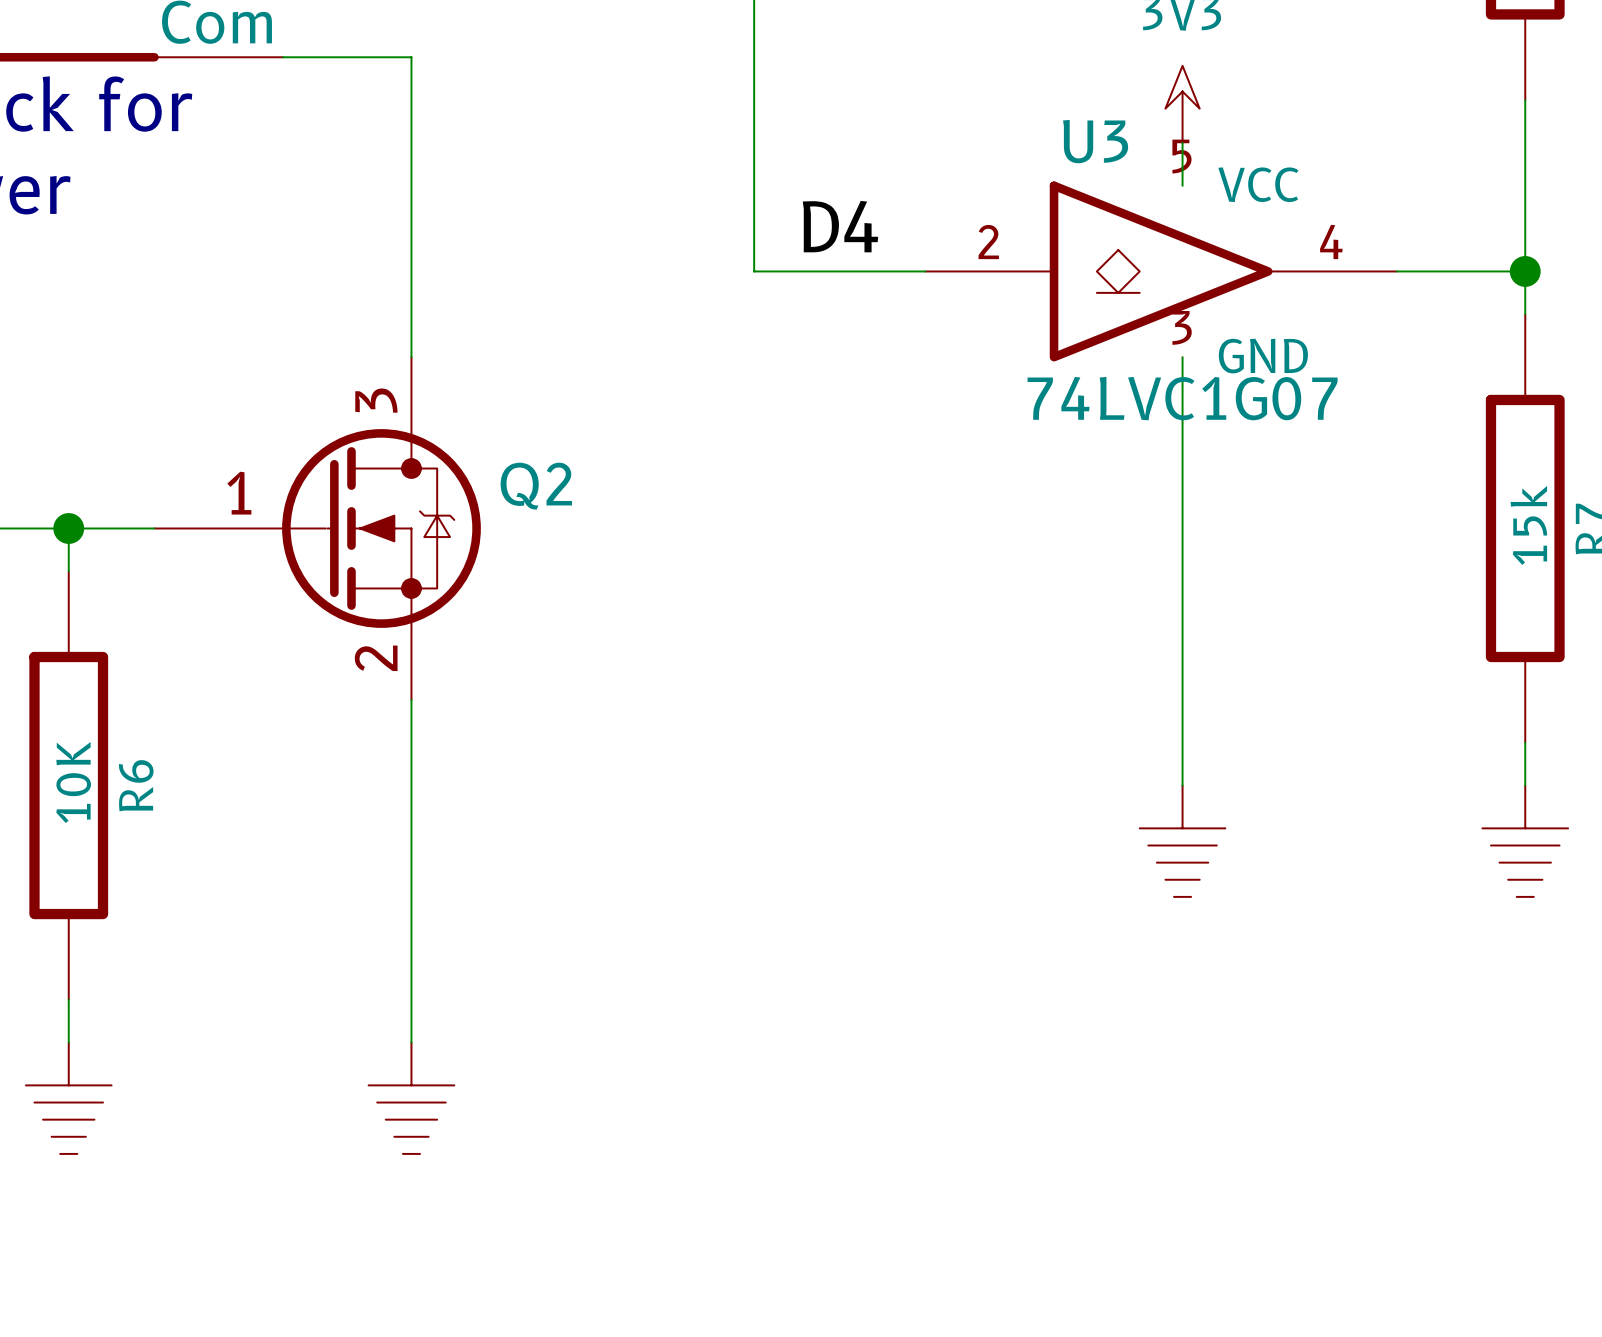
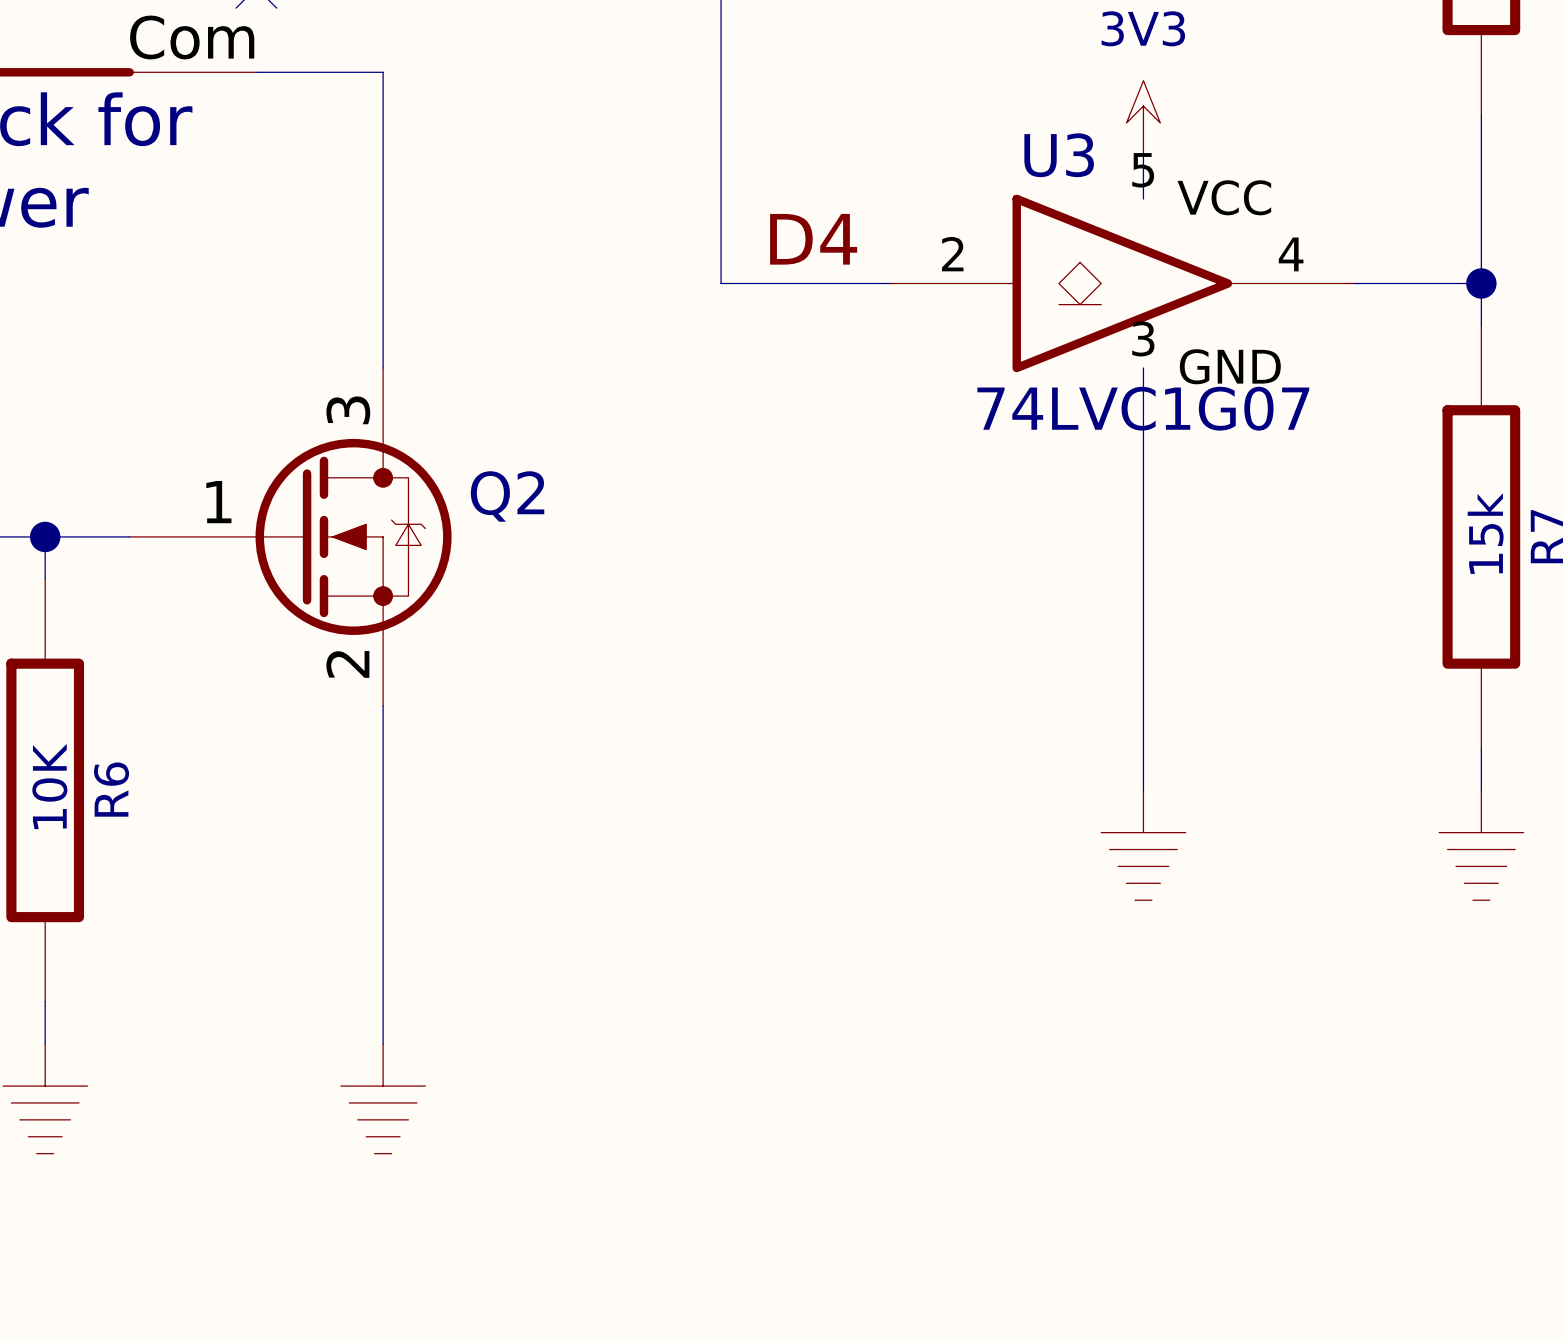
Q2 symbol: [154, 357, 481, 700] -> [129, 367, 452, 706]

